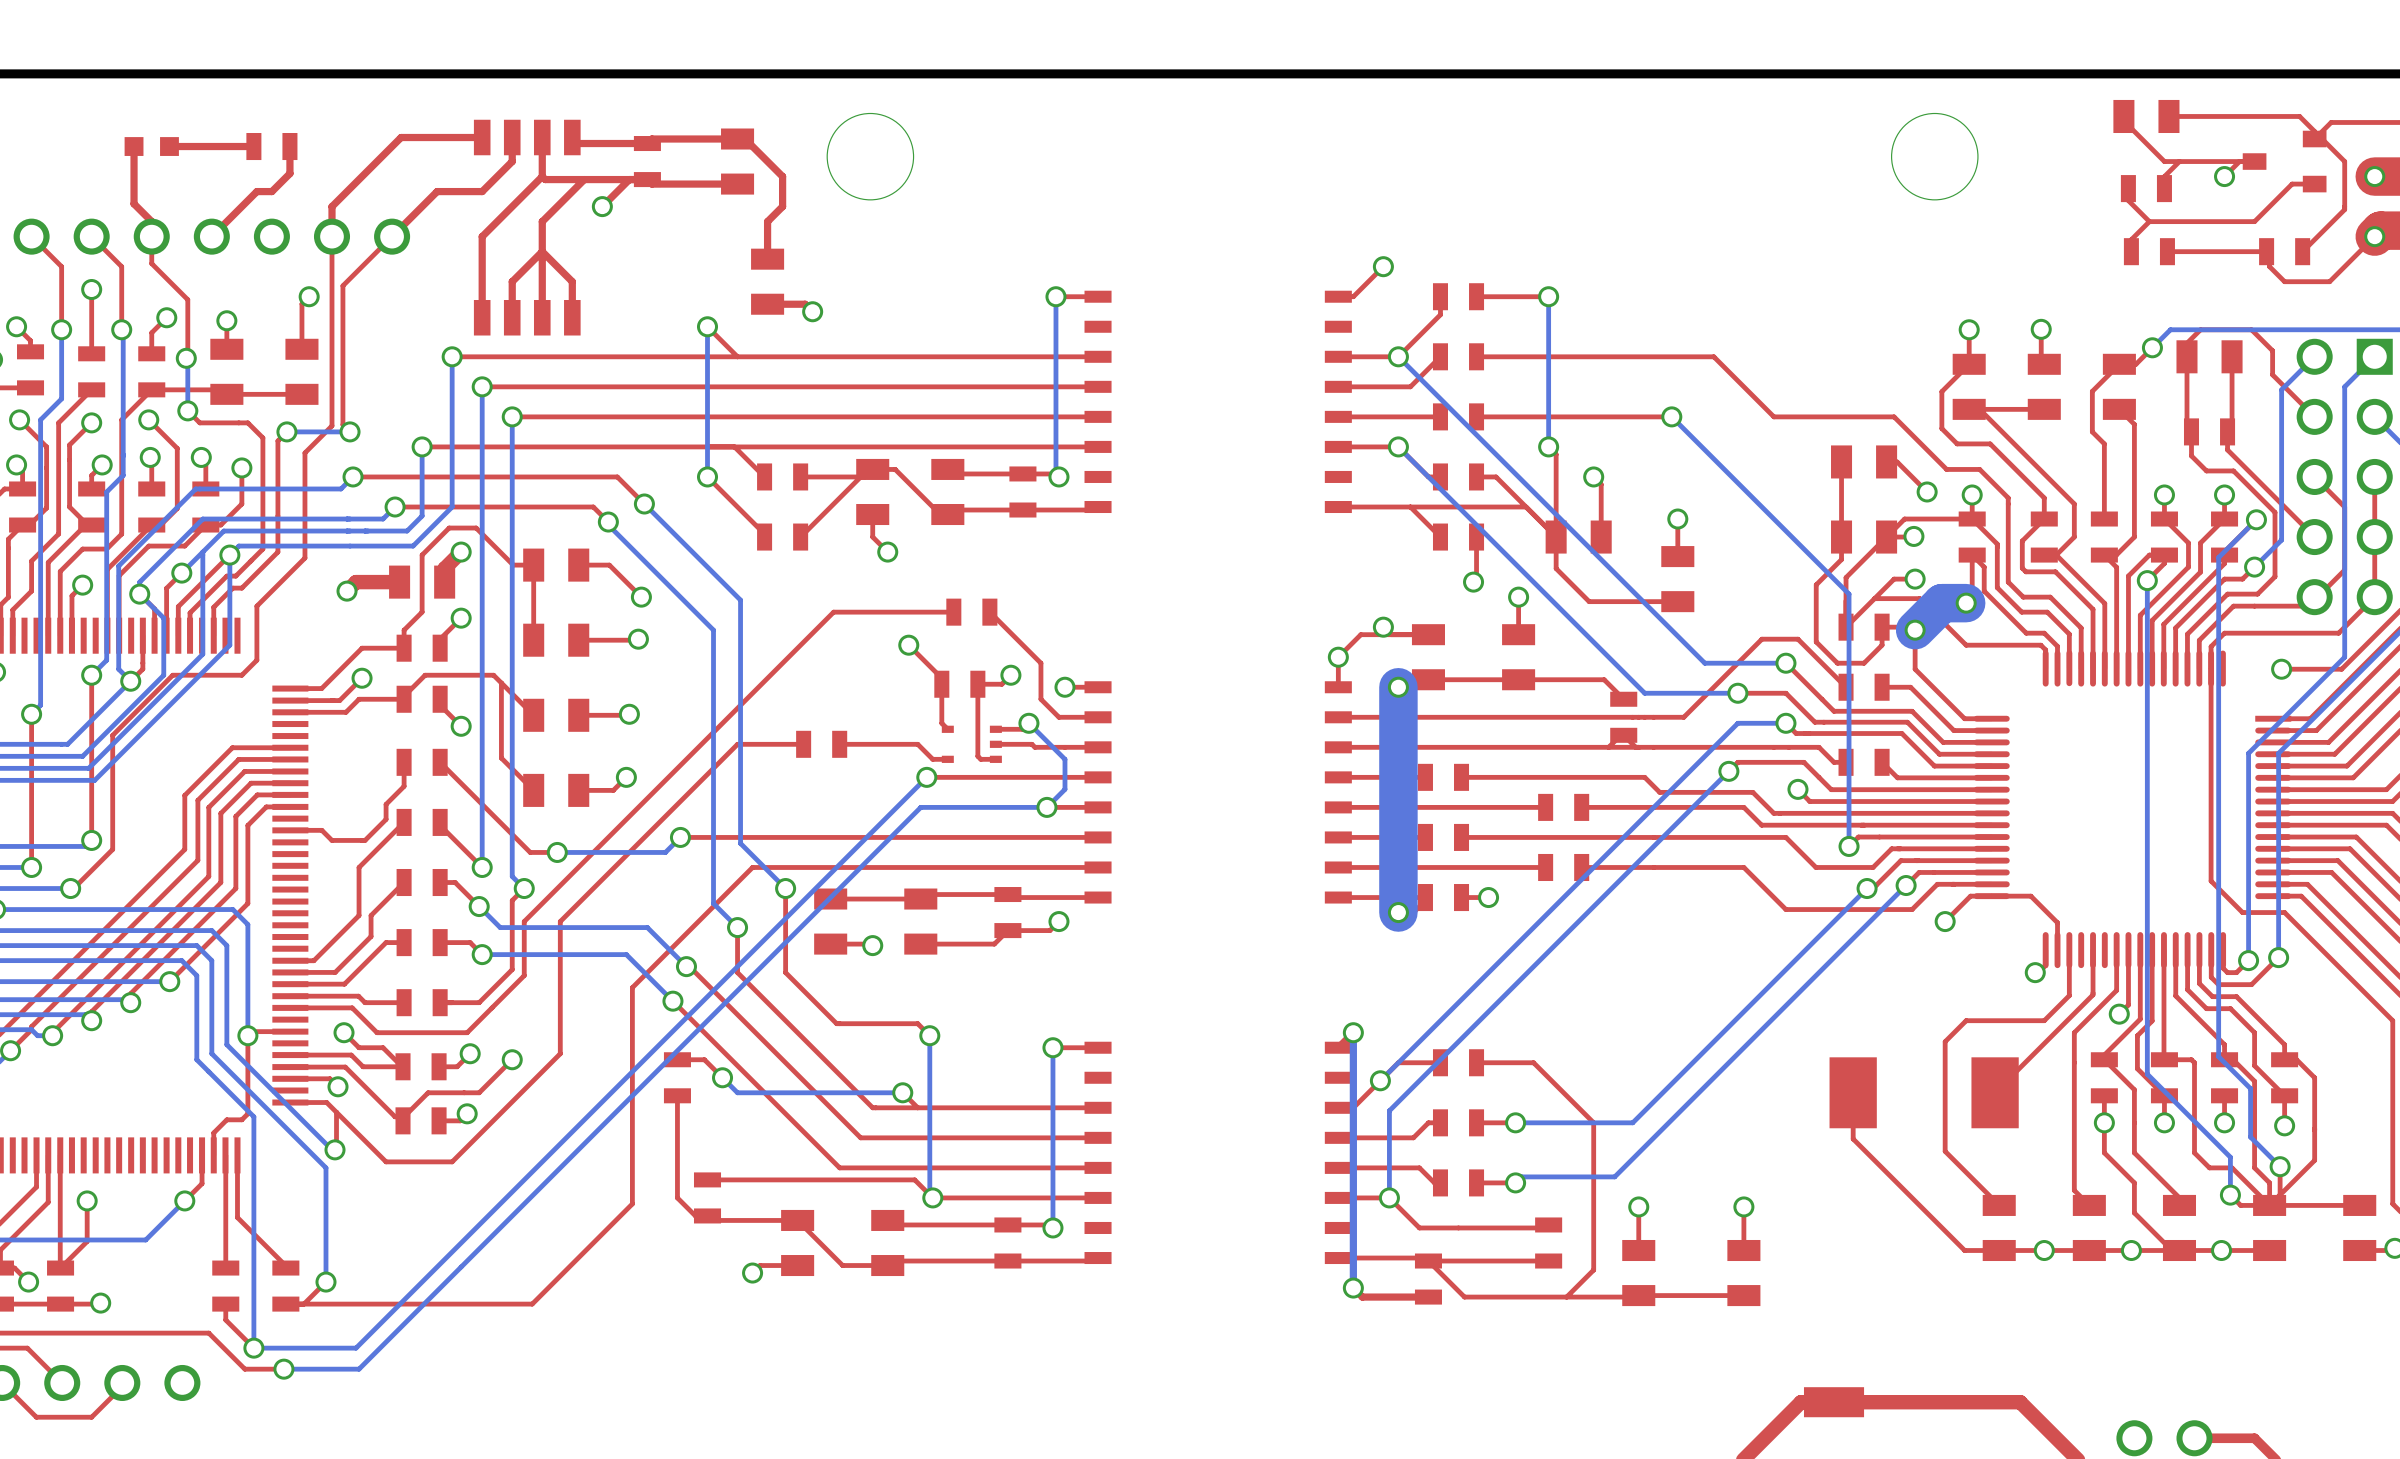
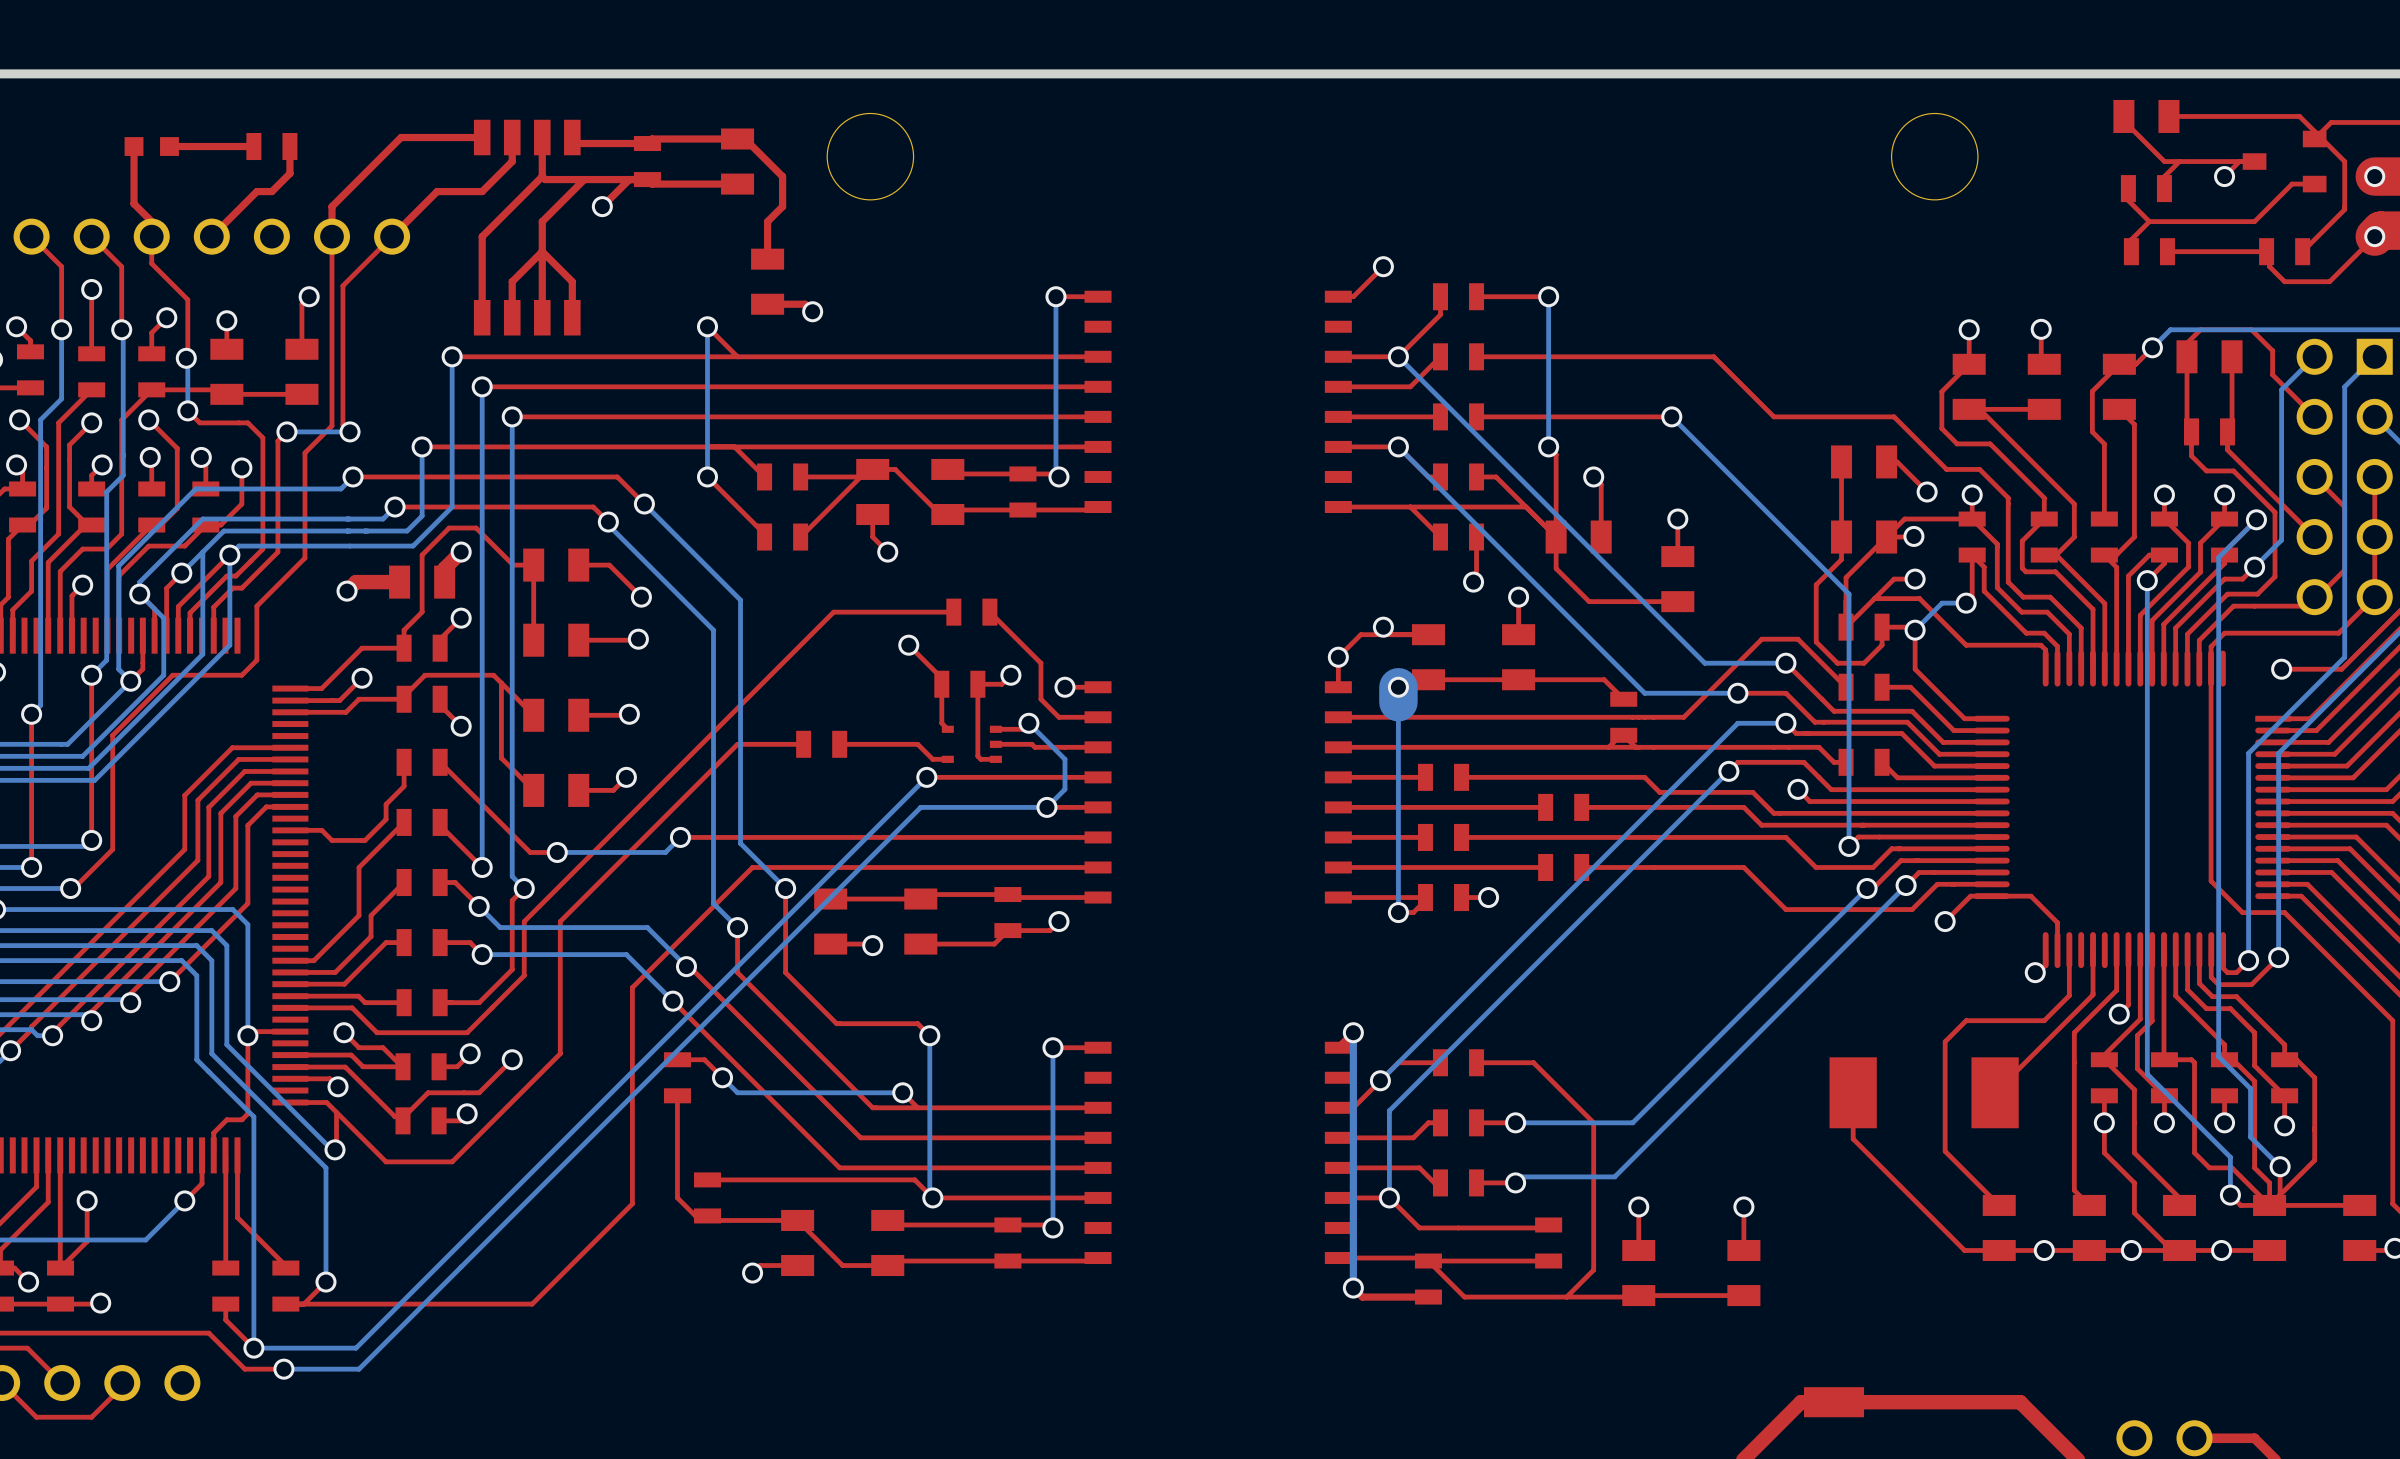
bottom track width: thick (1966, 603) (1942, 603) (1915, 630) -> thin (1966, 603) (1942, 603) (1915, 630)
bottom track width: thick (1398, 702) (1398, 912) -> thin (1398, 702) (1398, 912)

